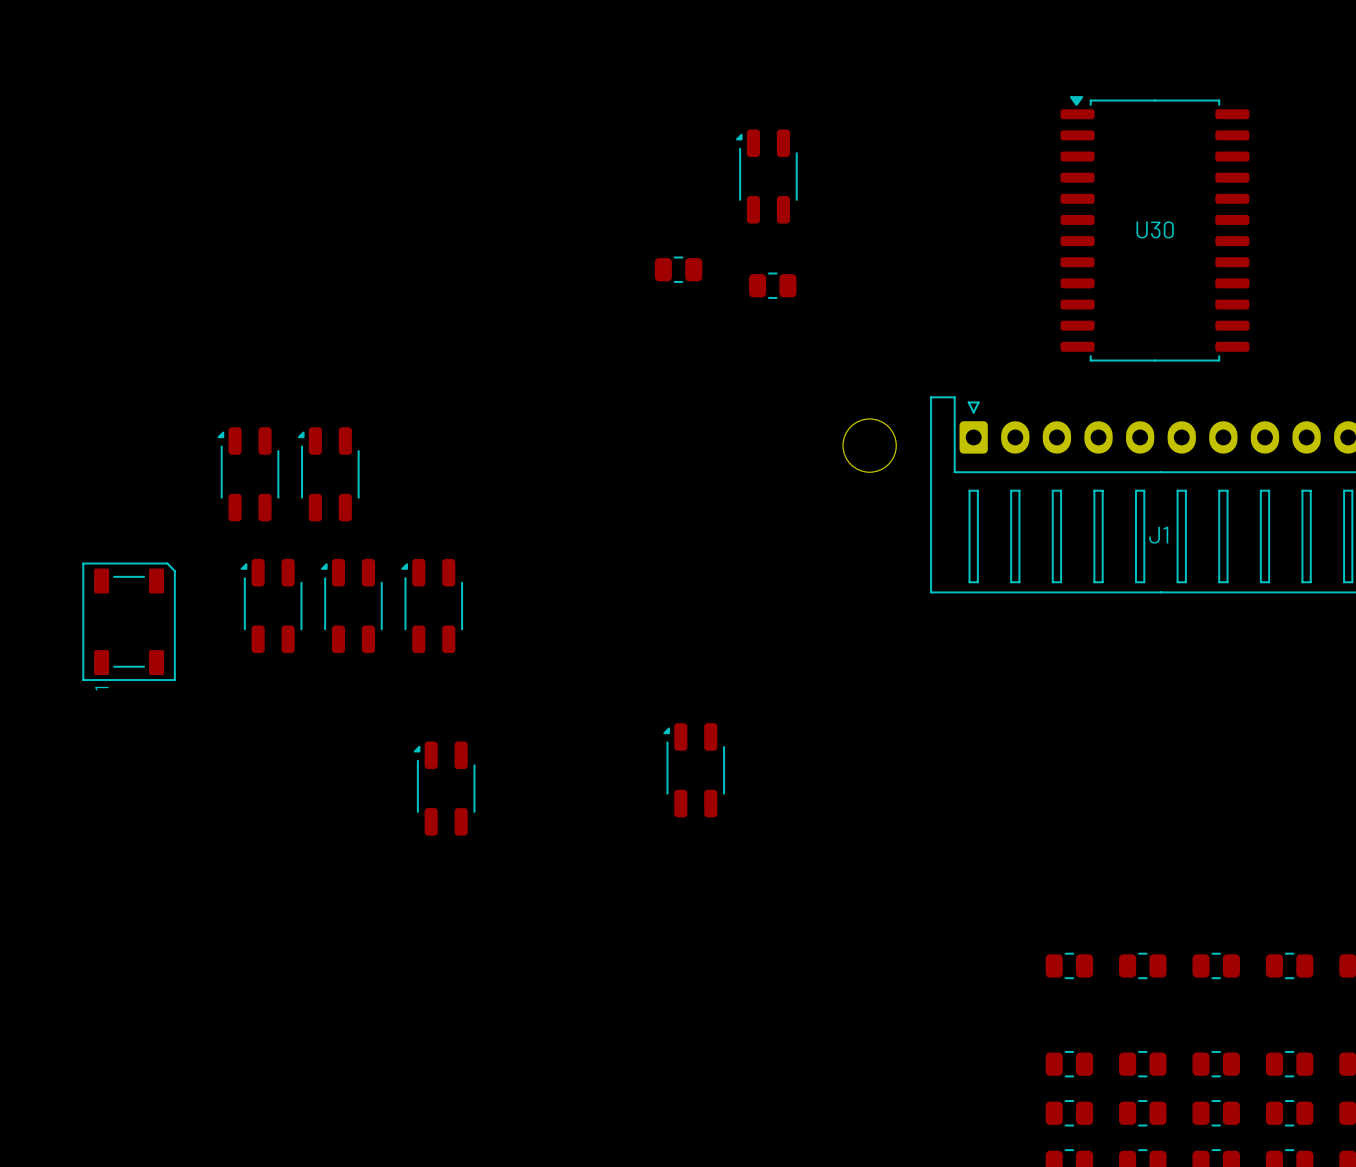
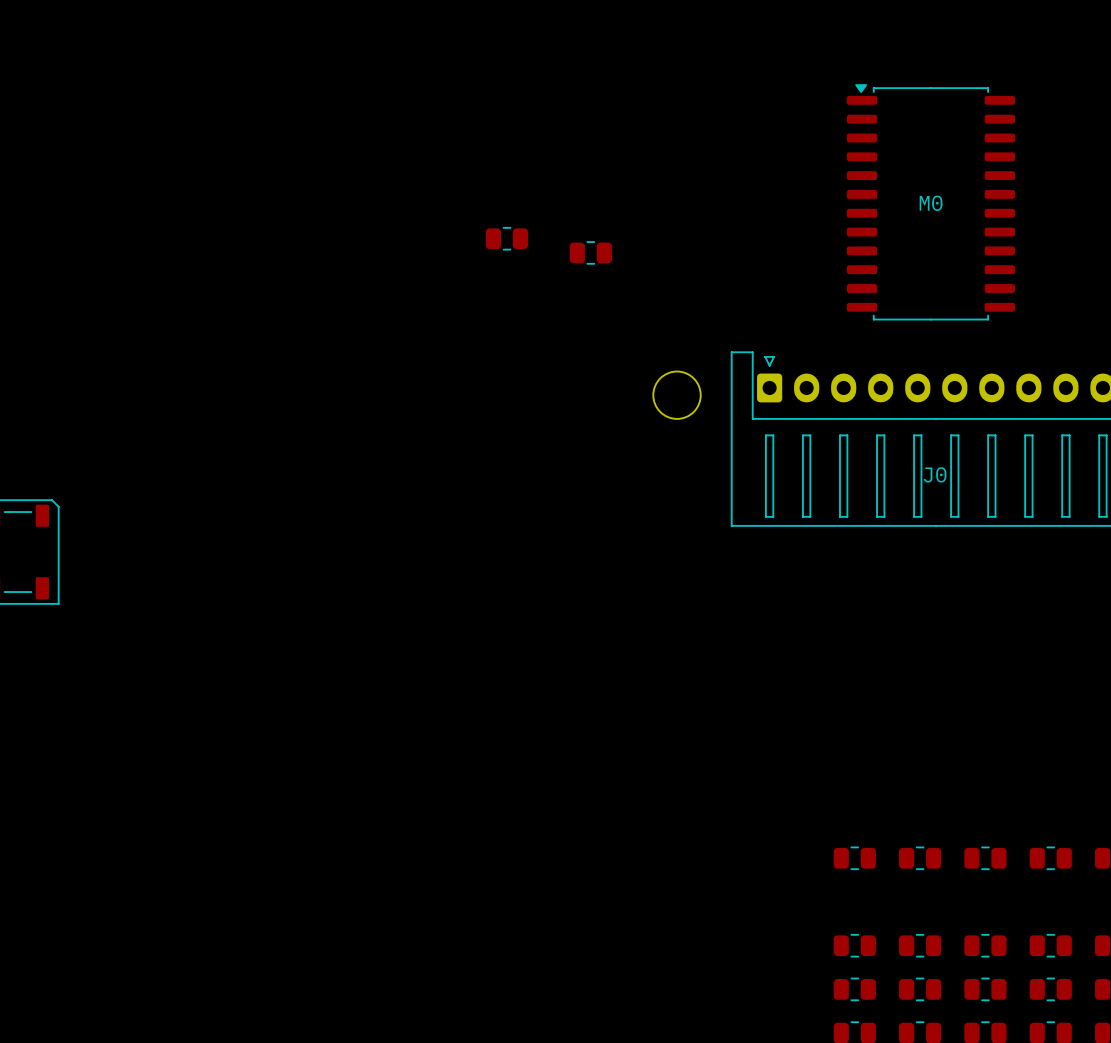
part: (766, 176) -> none
U30 name: U30 (1155, 229) -> M0 (931, 203)
part: (248, 474) -> none
part: (328, 474) -> none
J1 name: J1 (1158, 535) -> J0 (935, 474)
part: (271, 605) -> none
part: (351, 605) -> none
part: (432, 605) -> none
part: (694, 770) -> none
part: (444, 788) -> none

